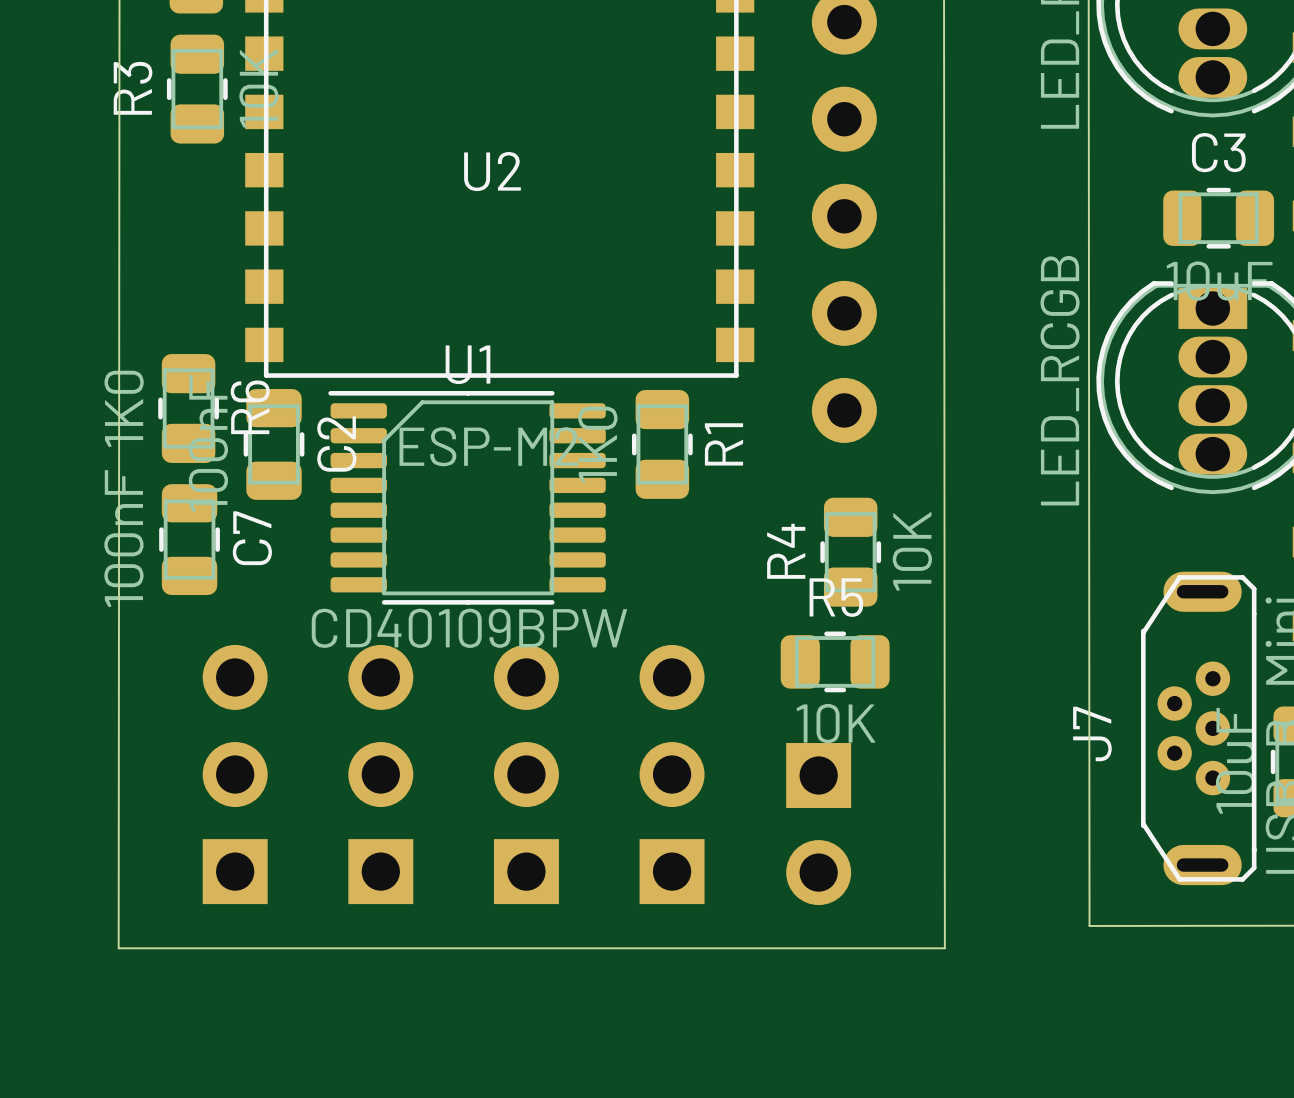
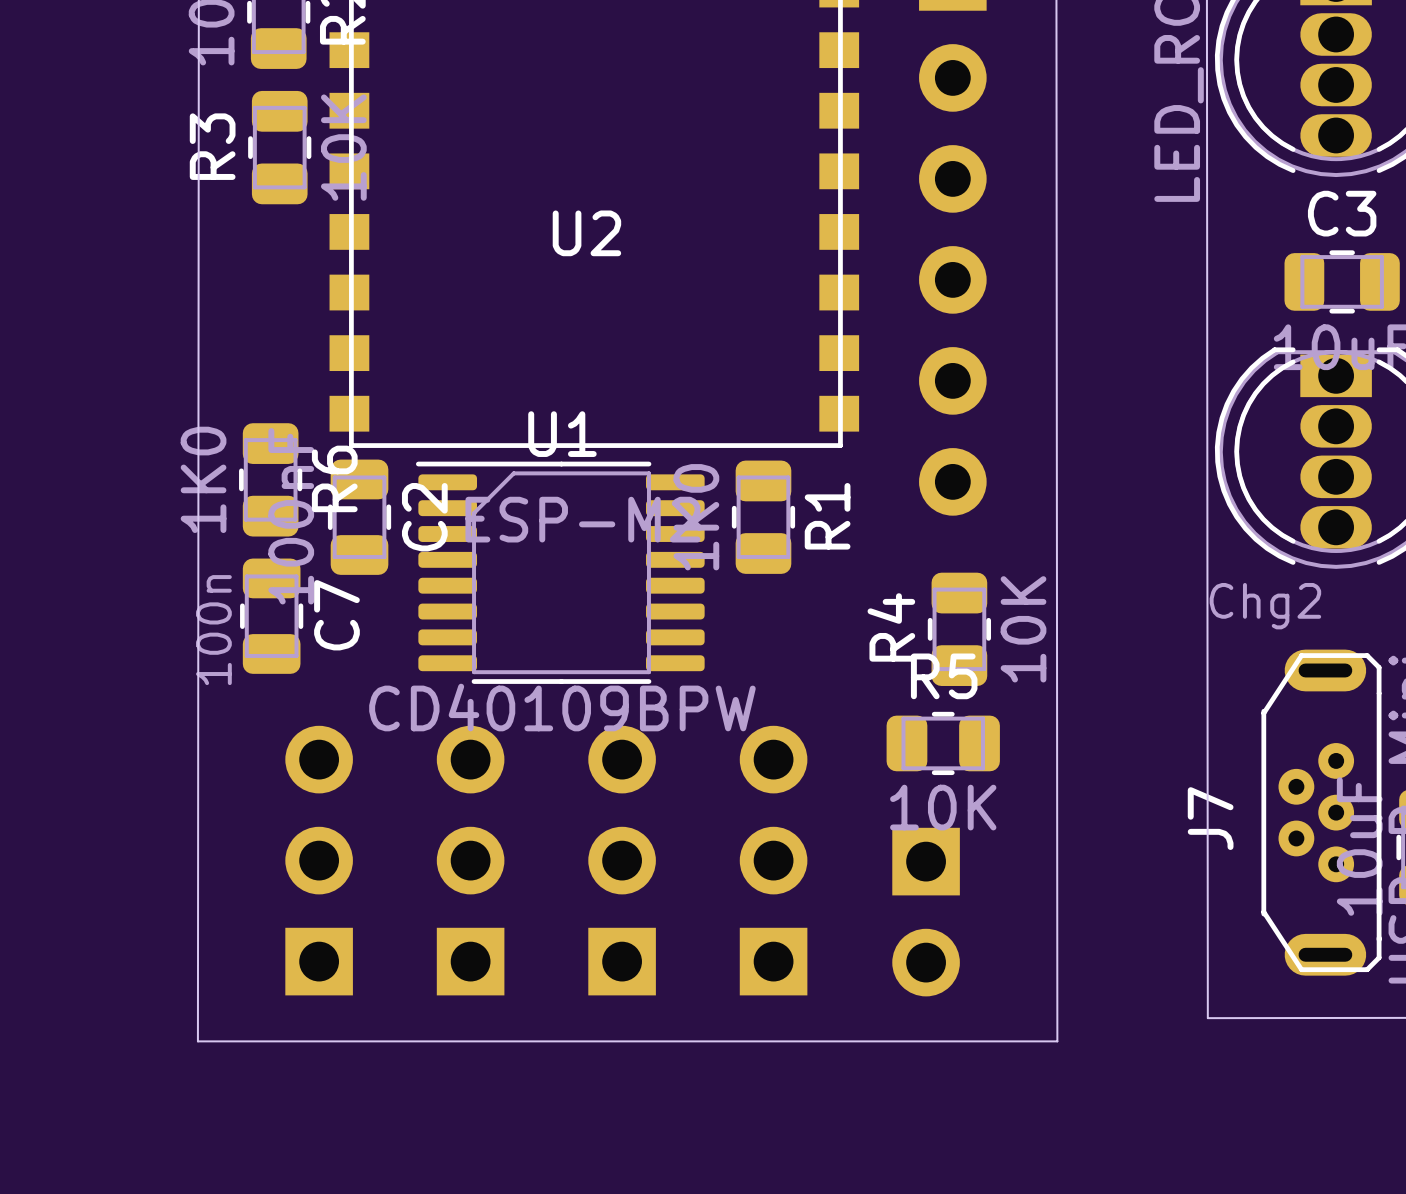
part value: LED_RCGB (1060, 380) -> Chg2 (1265, 606)
C7 value: 100nF (123, 538) -> 100n (213, 630)

